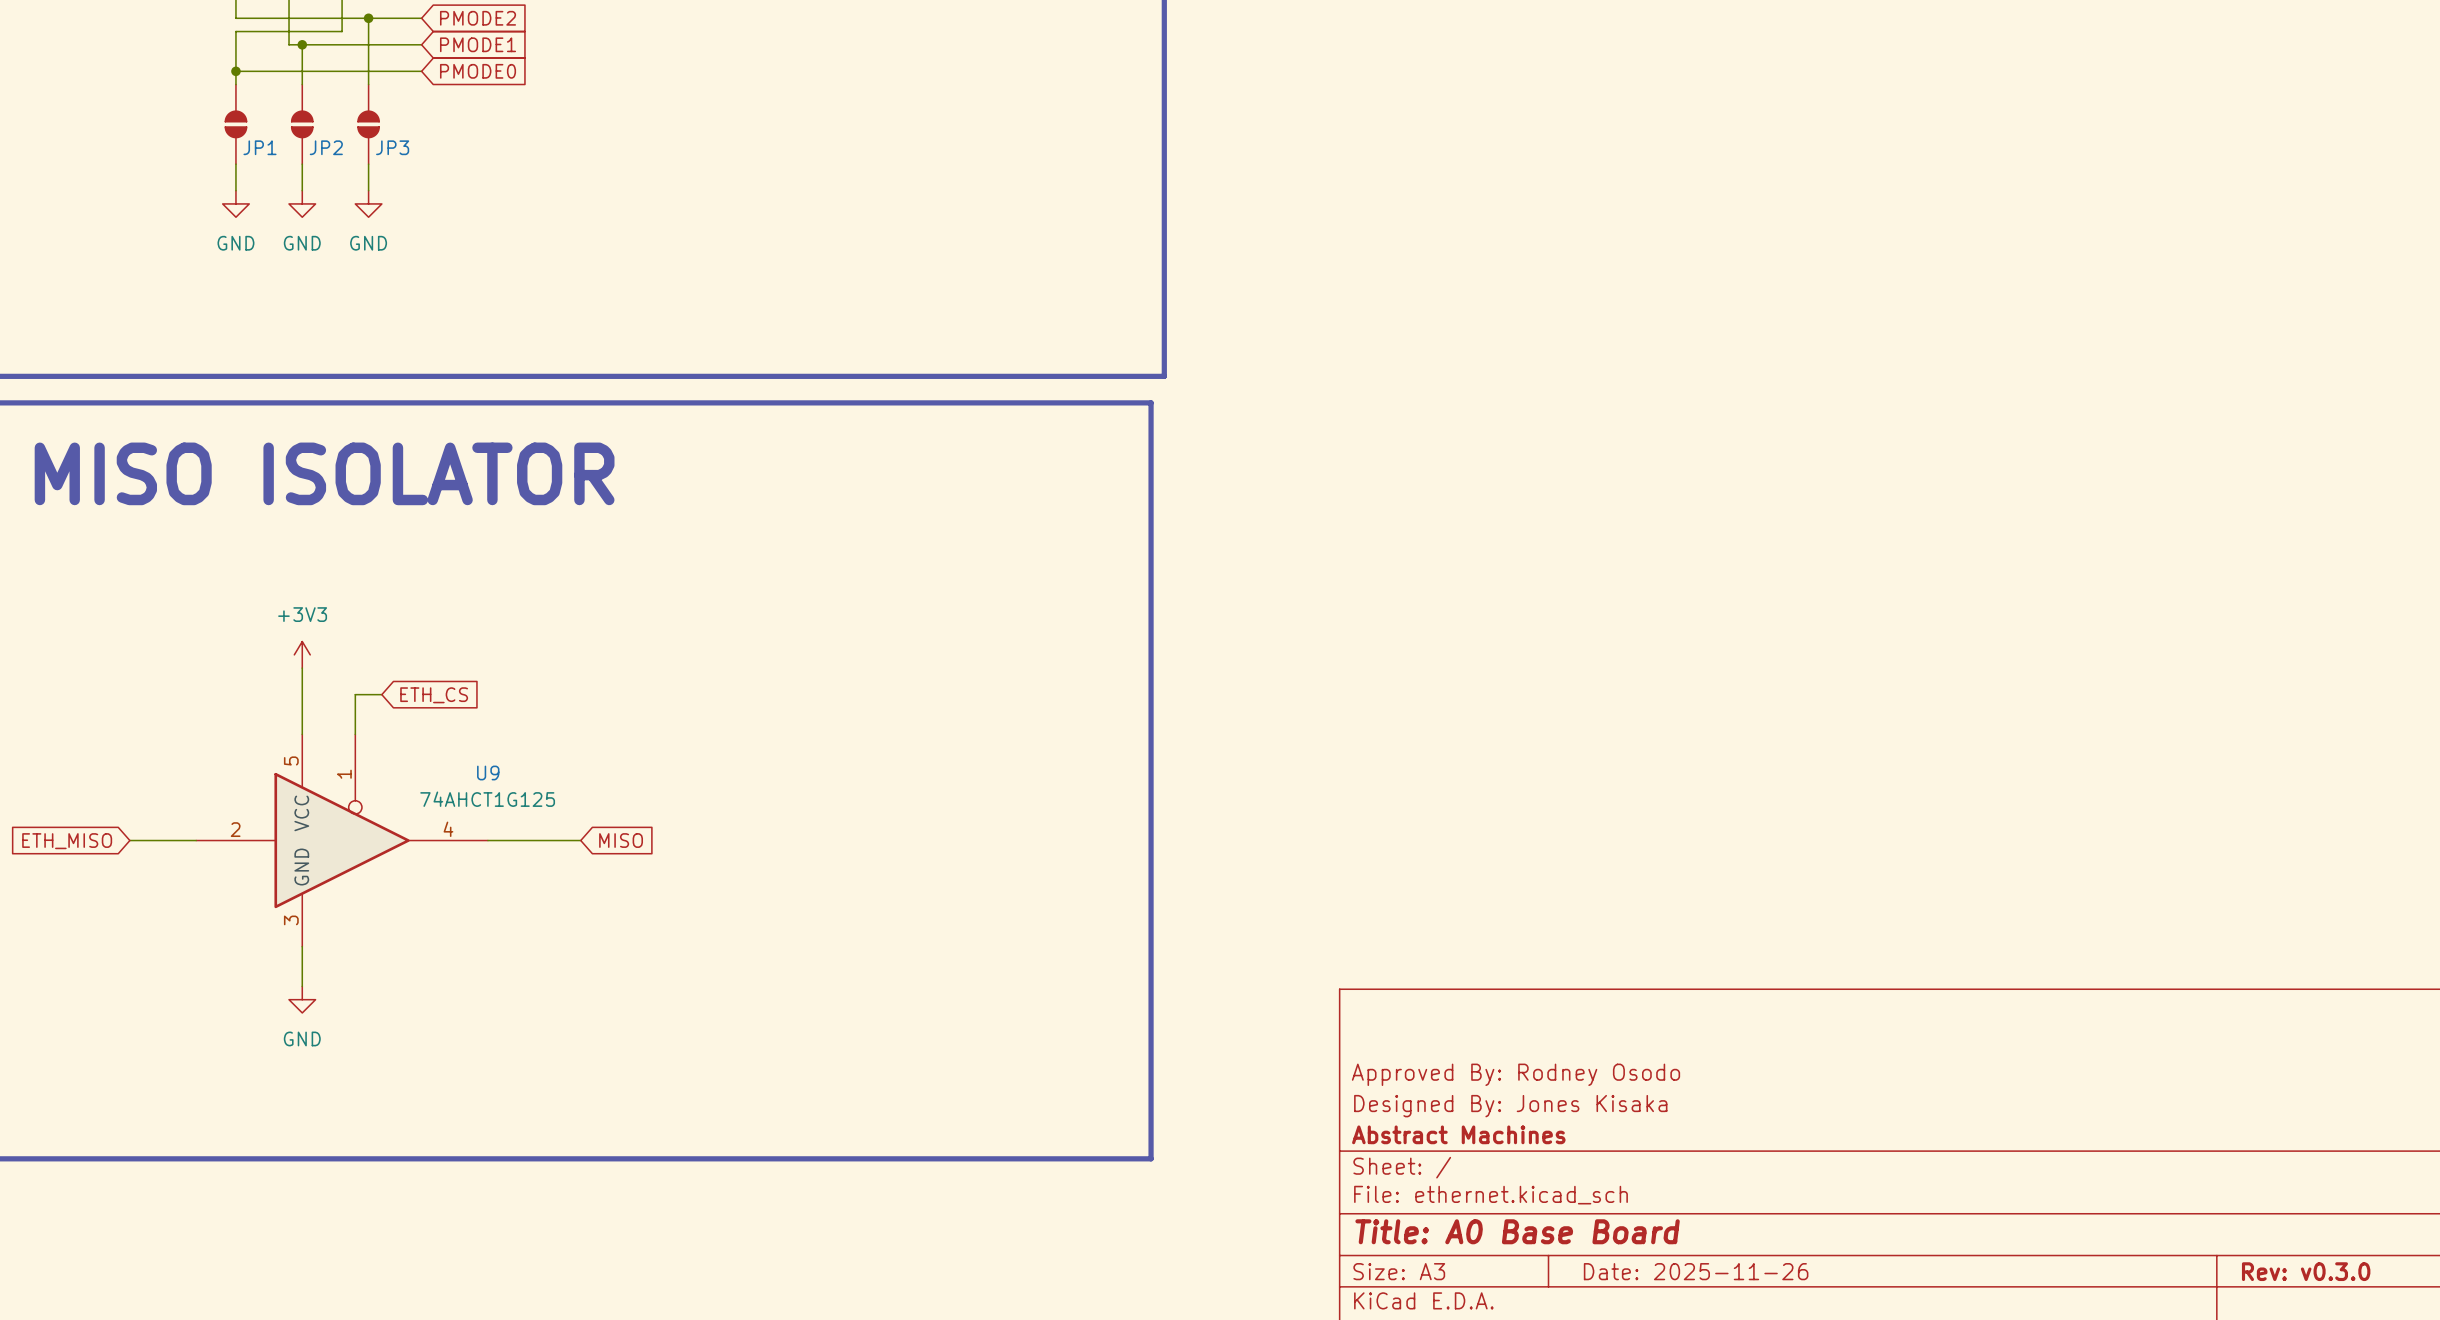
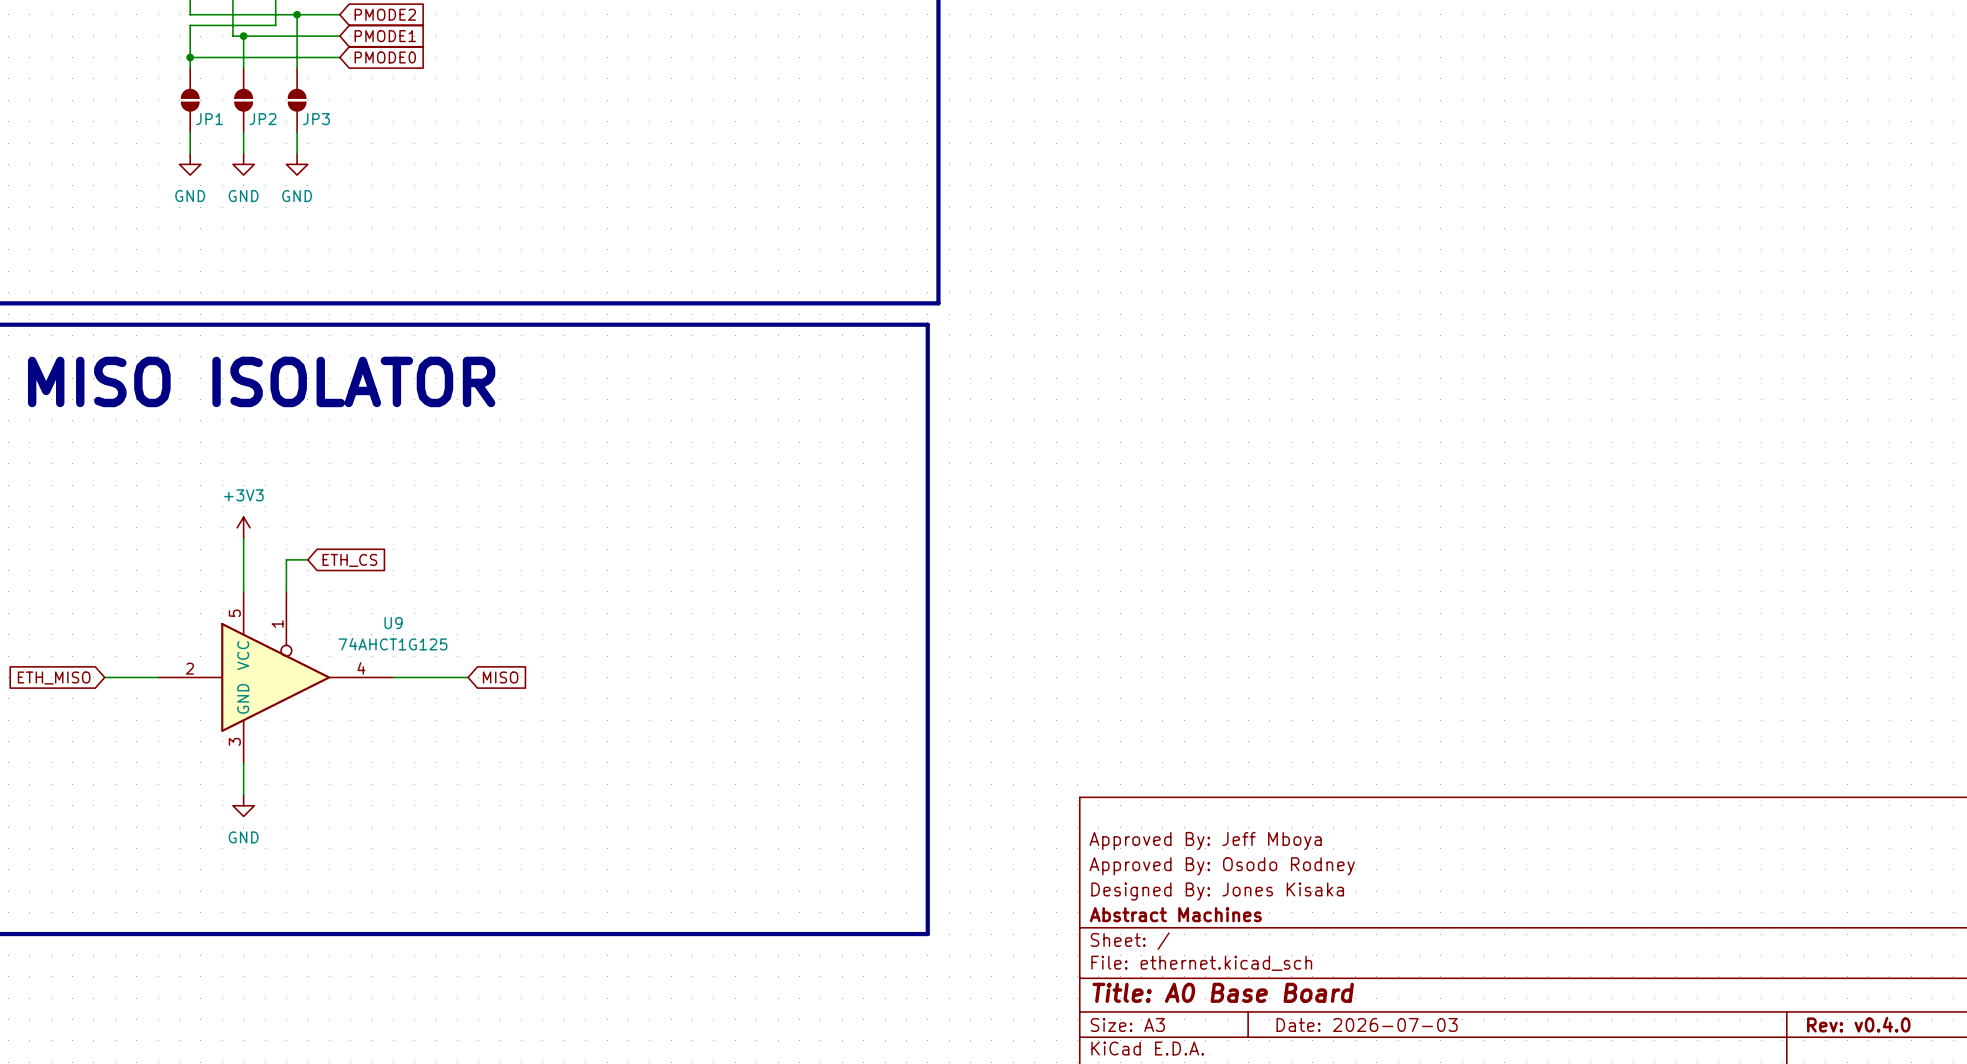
title block: none -> Approved By: Jeff Mboya (1205, 841)
title block: Approved By: Rodney Osodo (1515, 1074) -> Approved By: Osodo Rodney (1222, 866)
title block: Date: 2025-11-26 (1696, 1271) -> Date: 2026-07-03 (1367, 1024)
title block: Rev: v0.3.0 (2306, 1271) -> Rev: v0.4.0 (1858, 1024)

